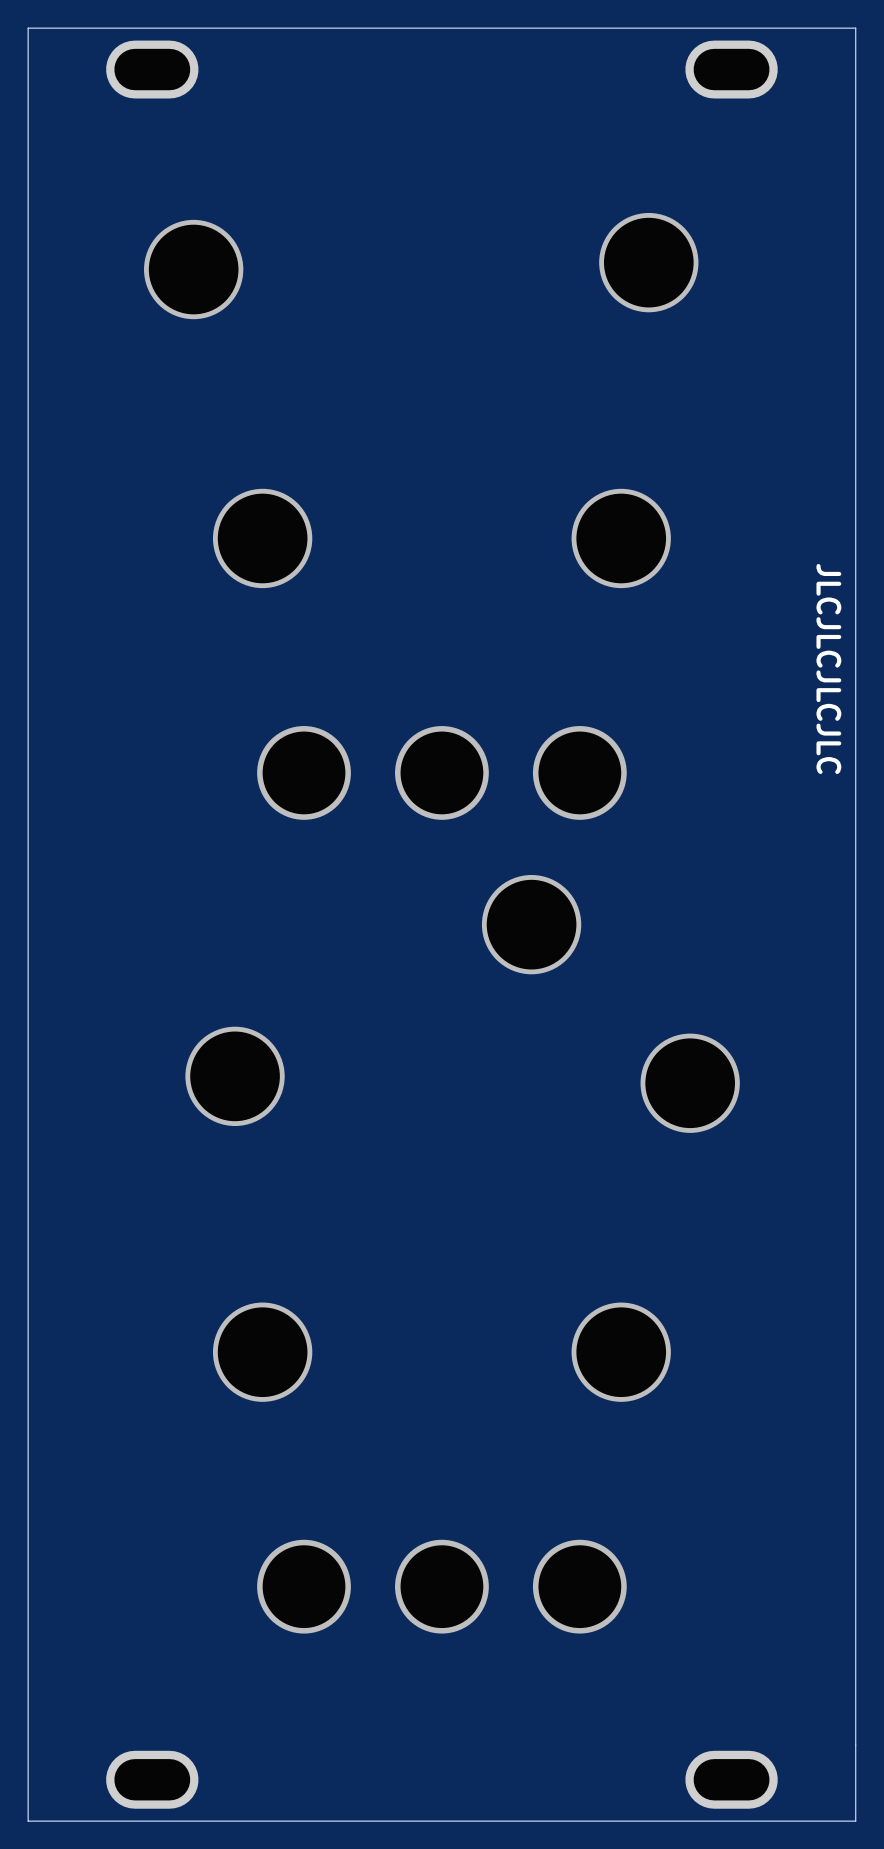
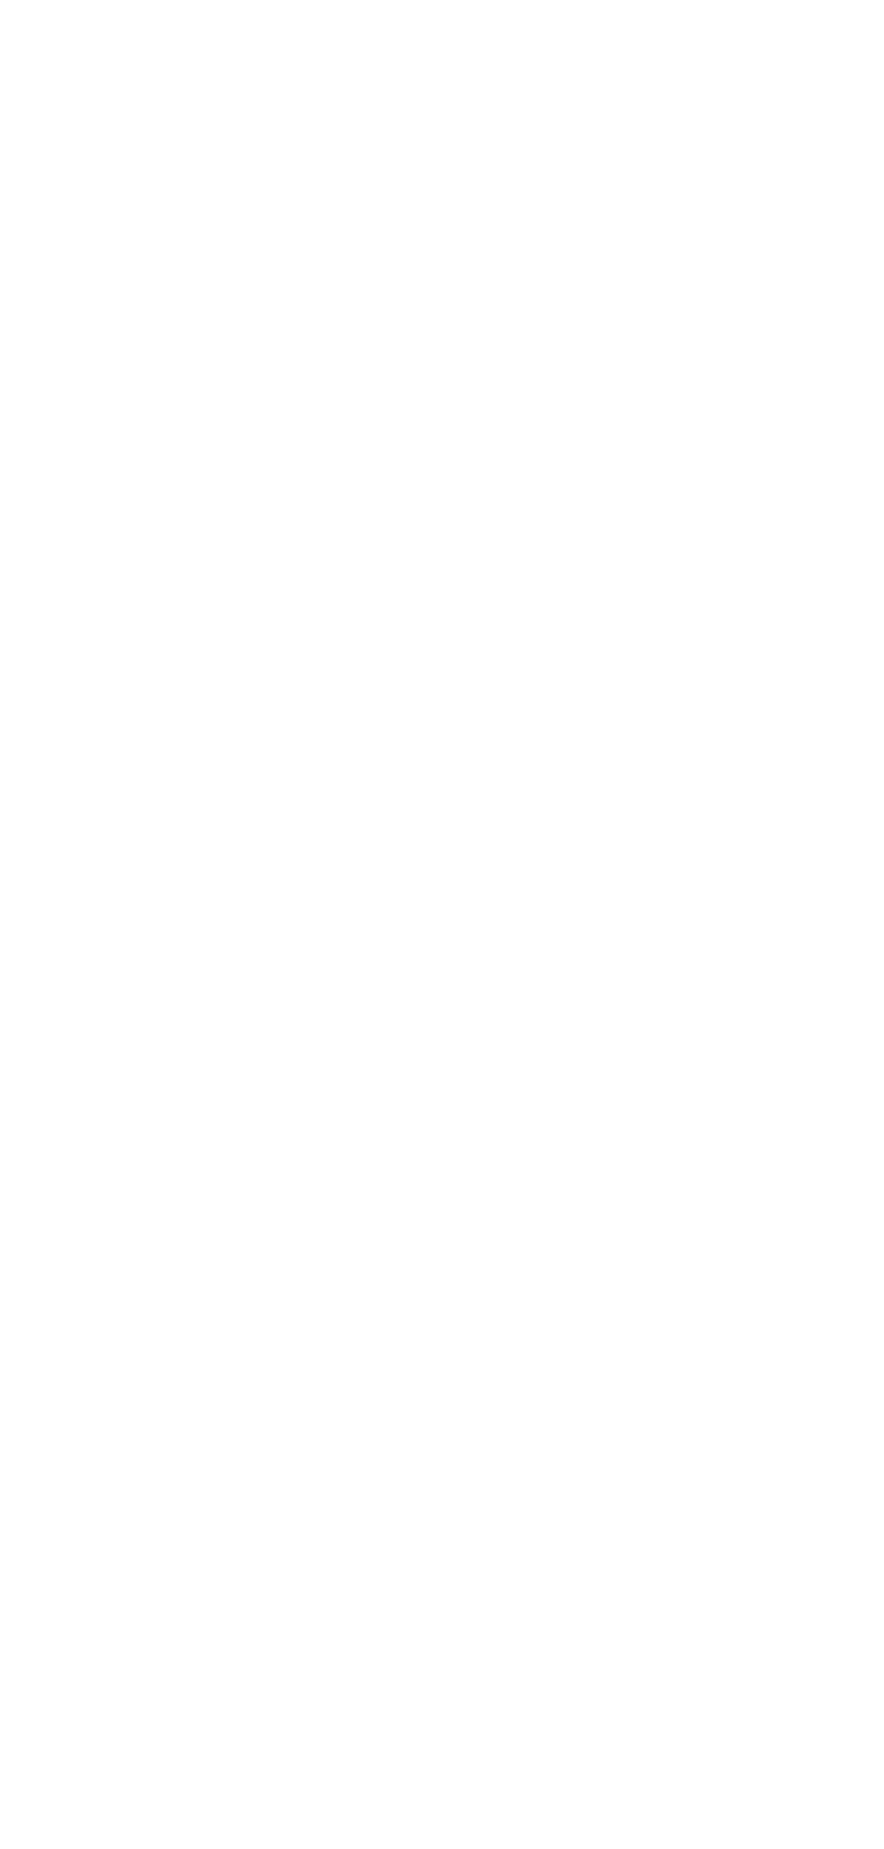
board edge: (855, 28) (855, 1821) (28, 1821) (28, 28) (855, 28) -> none
part: (152, 69) -> none
part: (731, 69) -> none
via: (648, 262) -> none
via: (193, 269) -> none
via: (262, 538) -> none
via: (621, 538) -> none
text: JLCJLCJLCJLC (828, 669) -> none
via: (304, 772) -> none
via: (441, 772) -> none
via: (579, 772) -> none
via: (531, 924) -> none
via: (235, 1076) -> none
via: (690, 1083) -> none
via: (262, 1352) -> none
via: (621, 1352) -> none
via: (304, 1586) -> none
via: (441, 1586) -> none
via: (579, 1586) -> none
part: (152, 1779) -> none
part: (731, 1779) -> none

